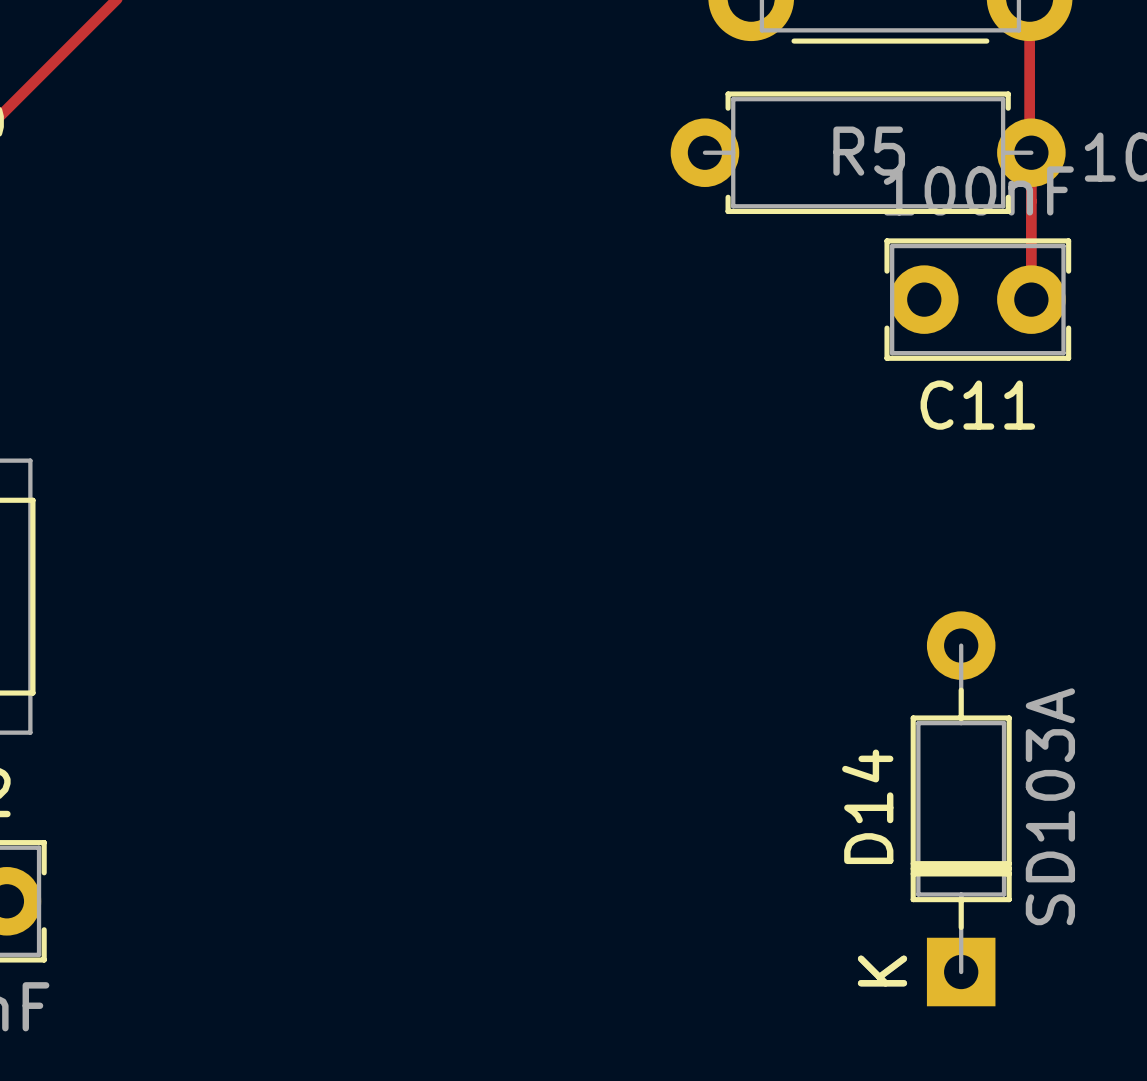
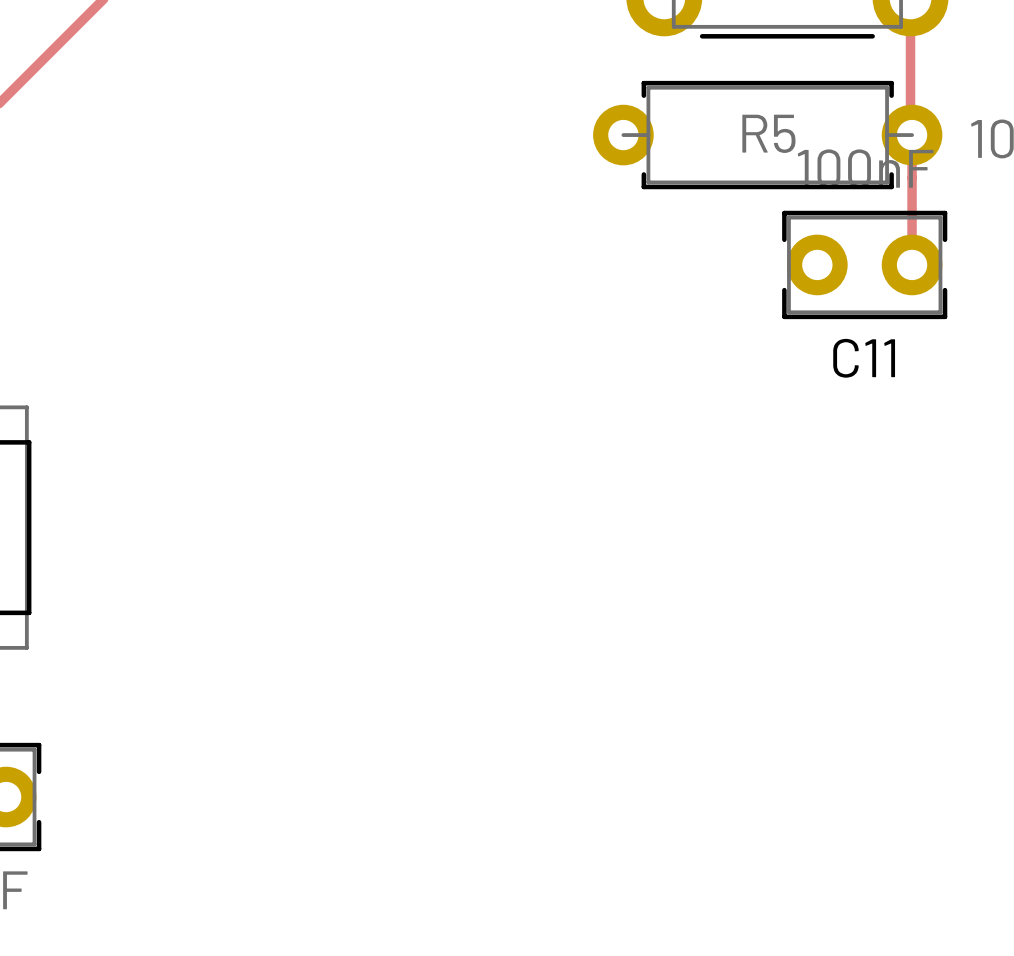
D14: SD103A (961, 808) -> none

